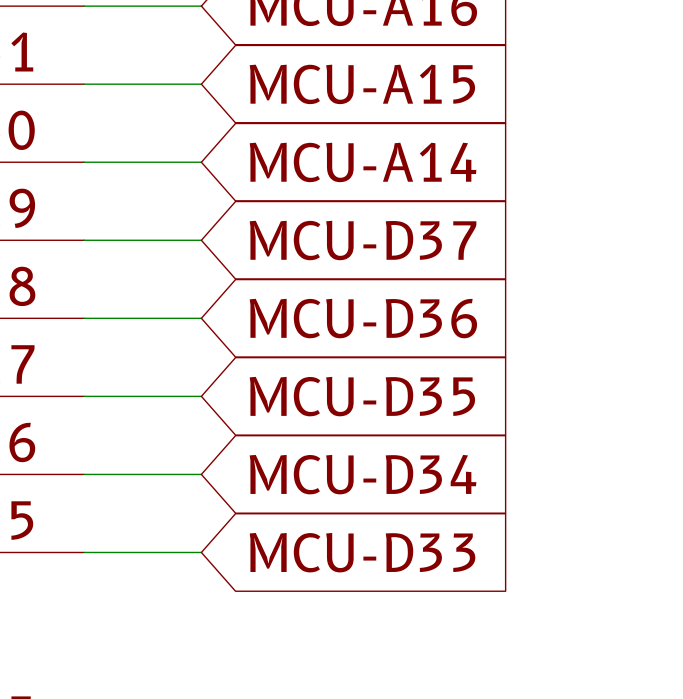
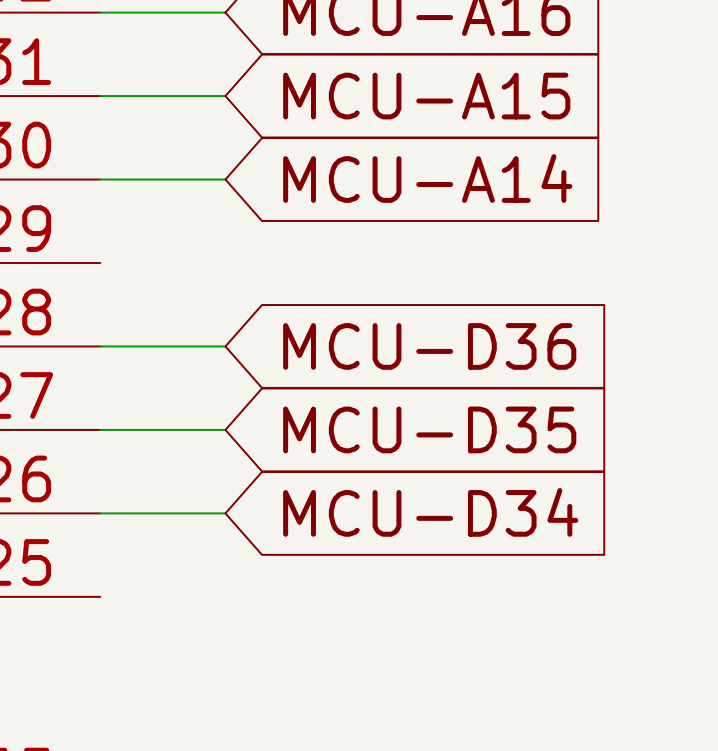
wire: (84, 240) (201, 240) -> none
global label: MCU-D37 (363, 240) -> none
wire: (84, 552) (201, 552) -> none
global label: MCU-D33 (362, 552) -> none

